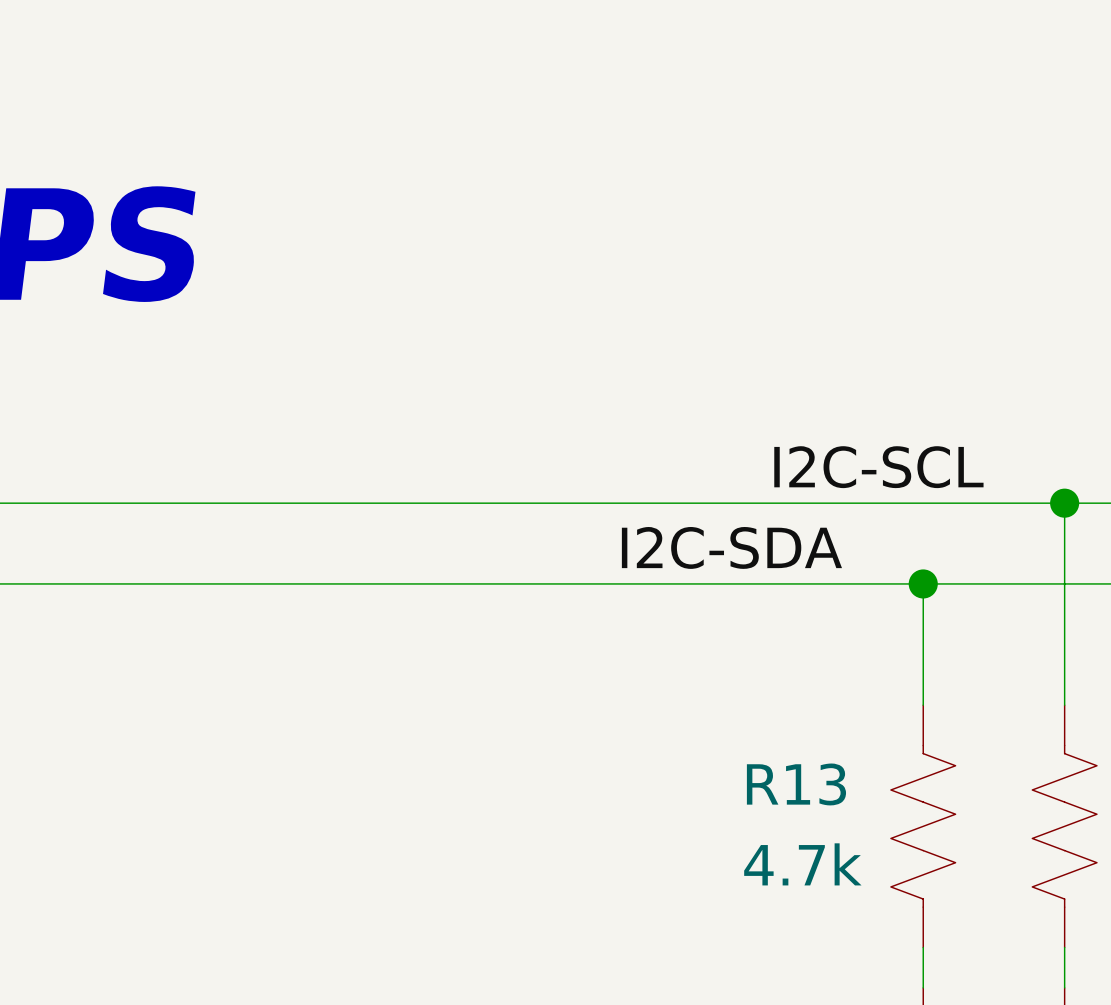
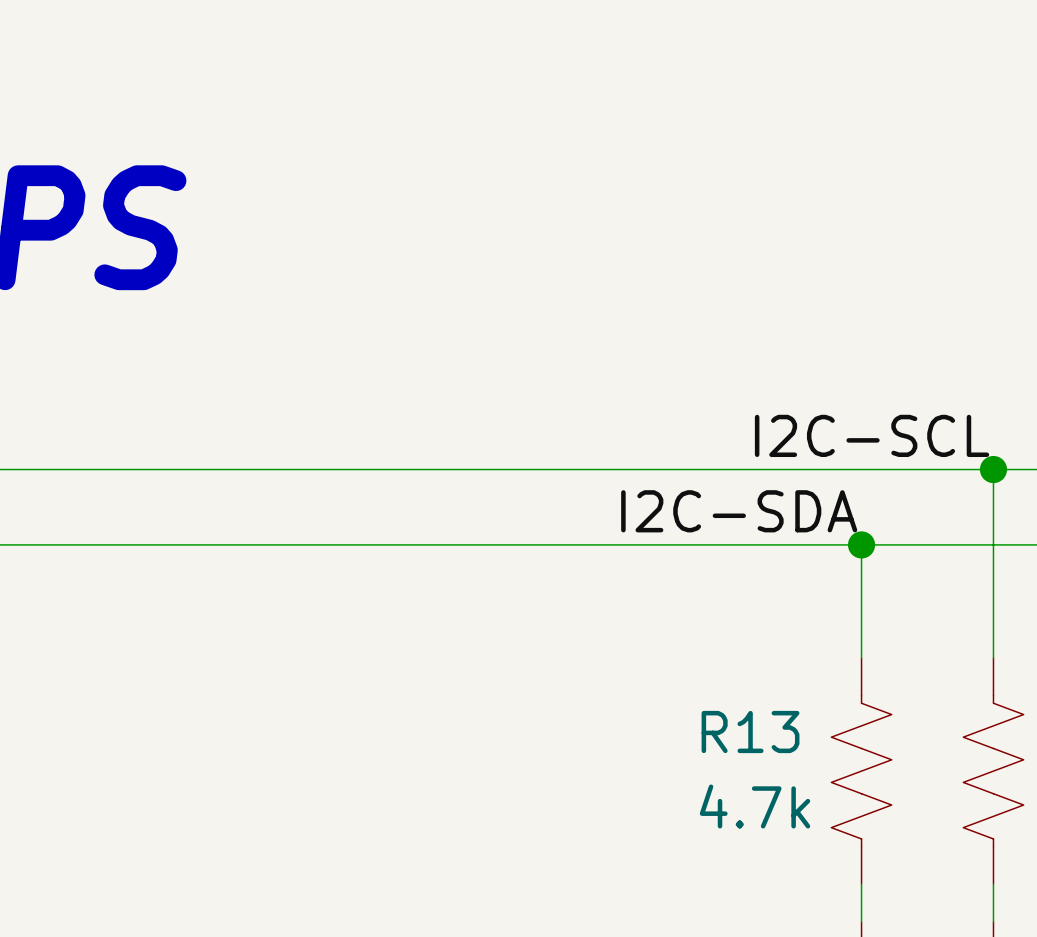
label position: I2C-SCL (878, 467) -> I2C-SCL (872, 435)
label position: I2C-SDA (731, 547) -> I2C-SDA (739, 511)

